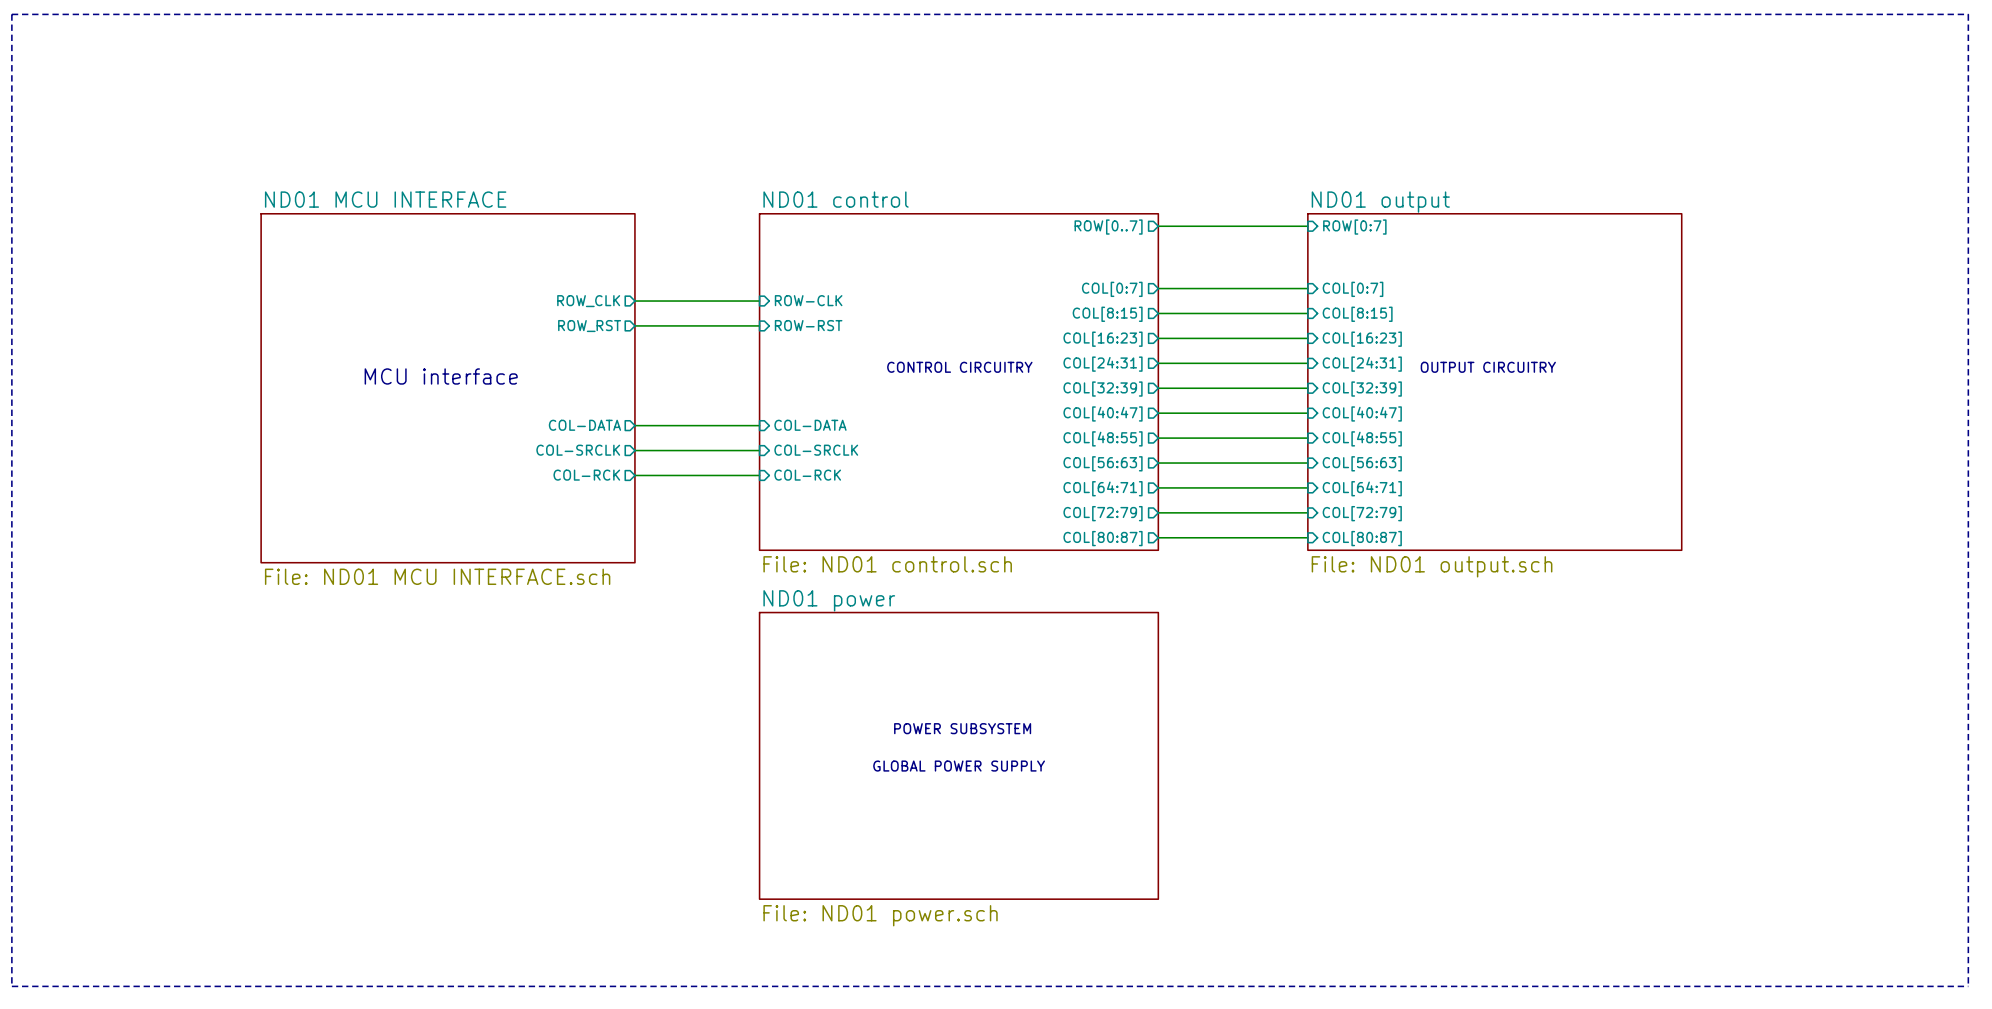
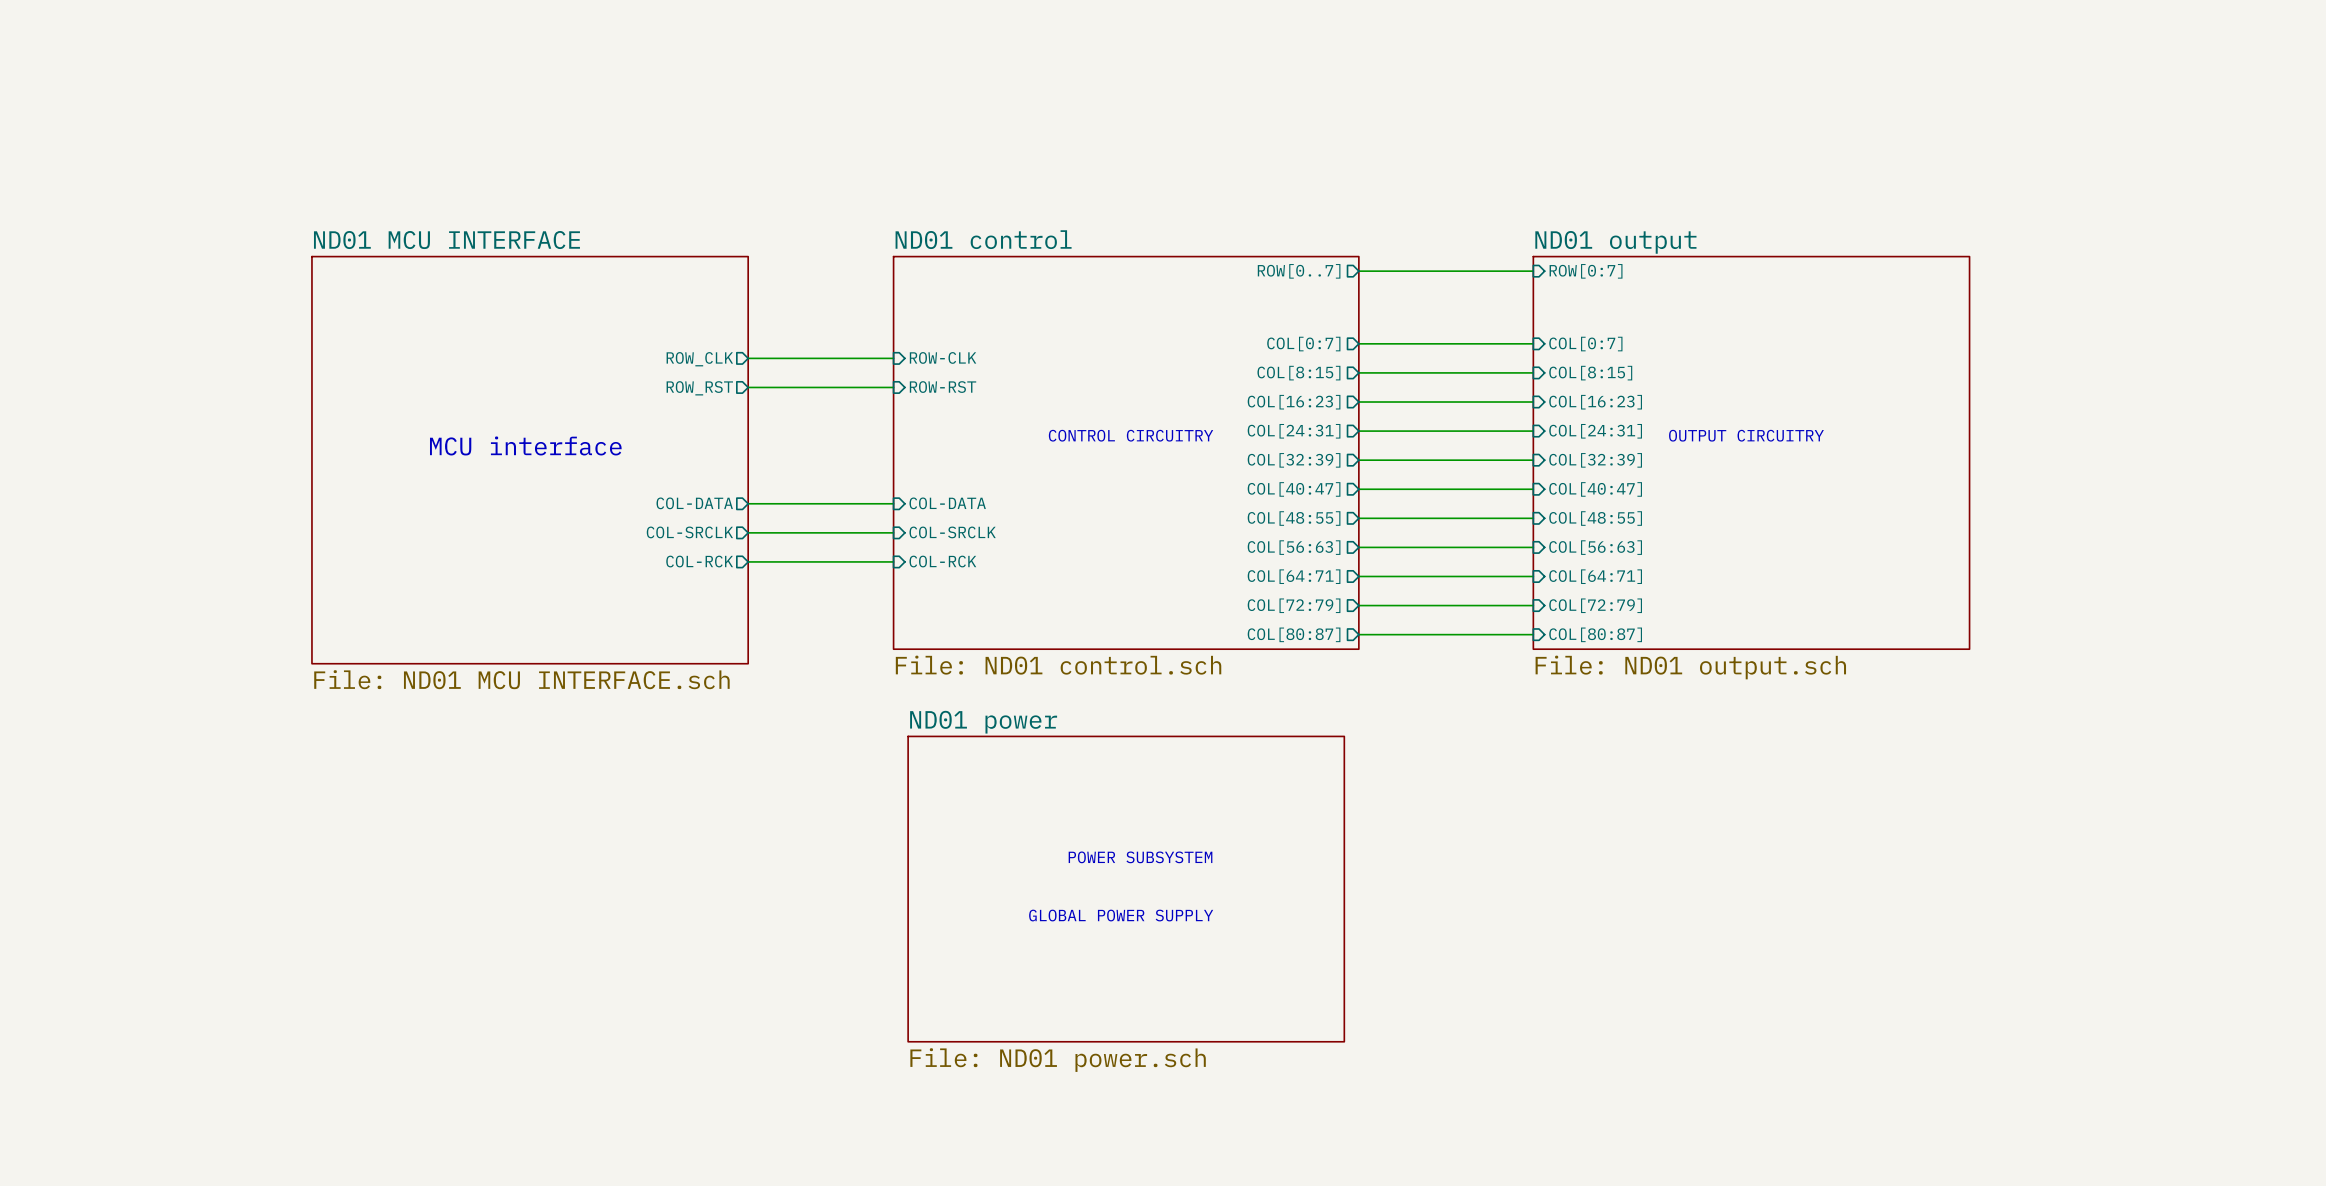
line: (11, 14) (11, 986) (1968, 986) (1968, 14) (11, 14) -> none
sheet ND01 power shape: [759, 612, 1159, 900] -> [908, 736, 1345, 1042]
text position: GLOBAL POWER SUPPLY (959, 766) -> GLOBAL POWER SUPPLY (1121, 915)

